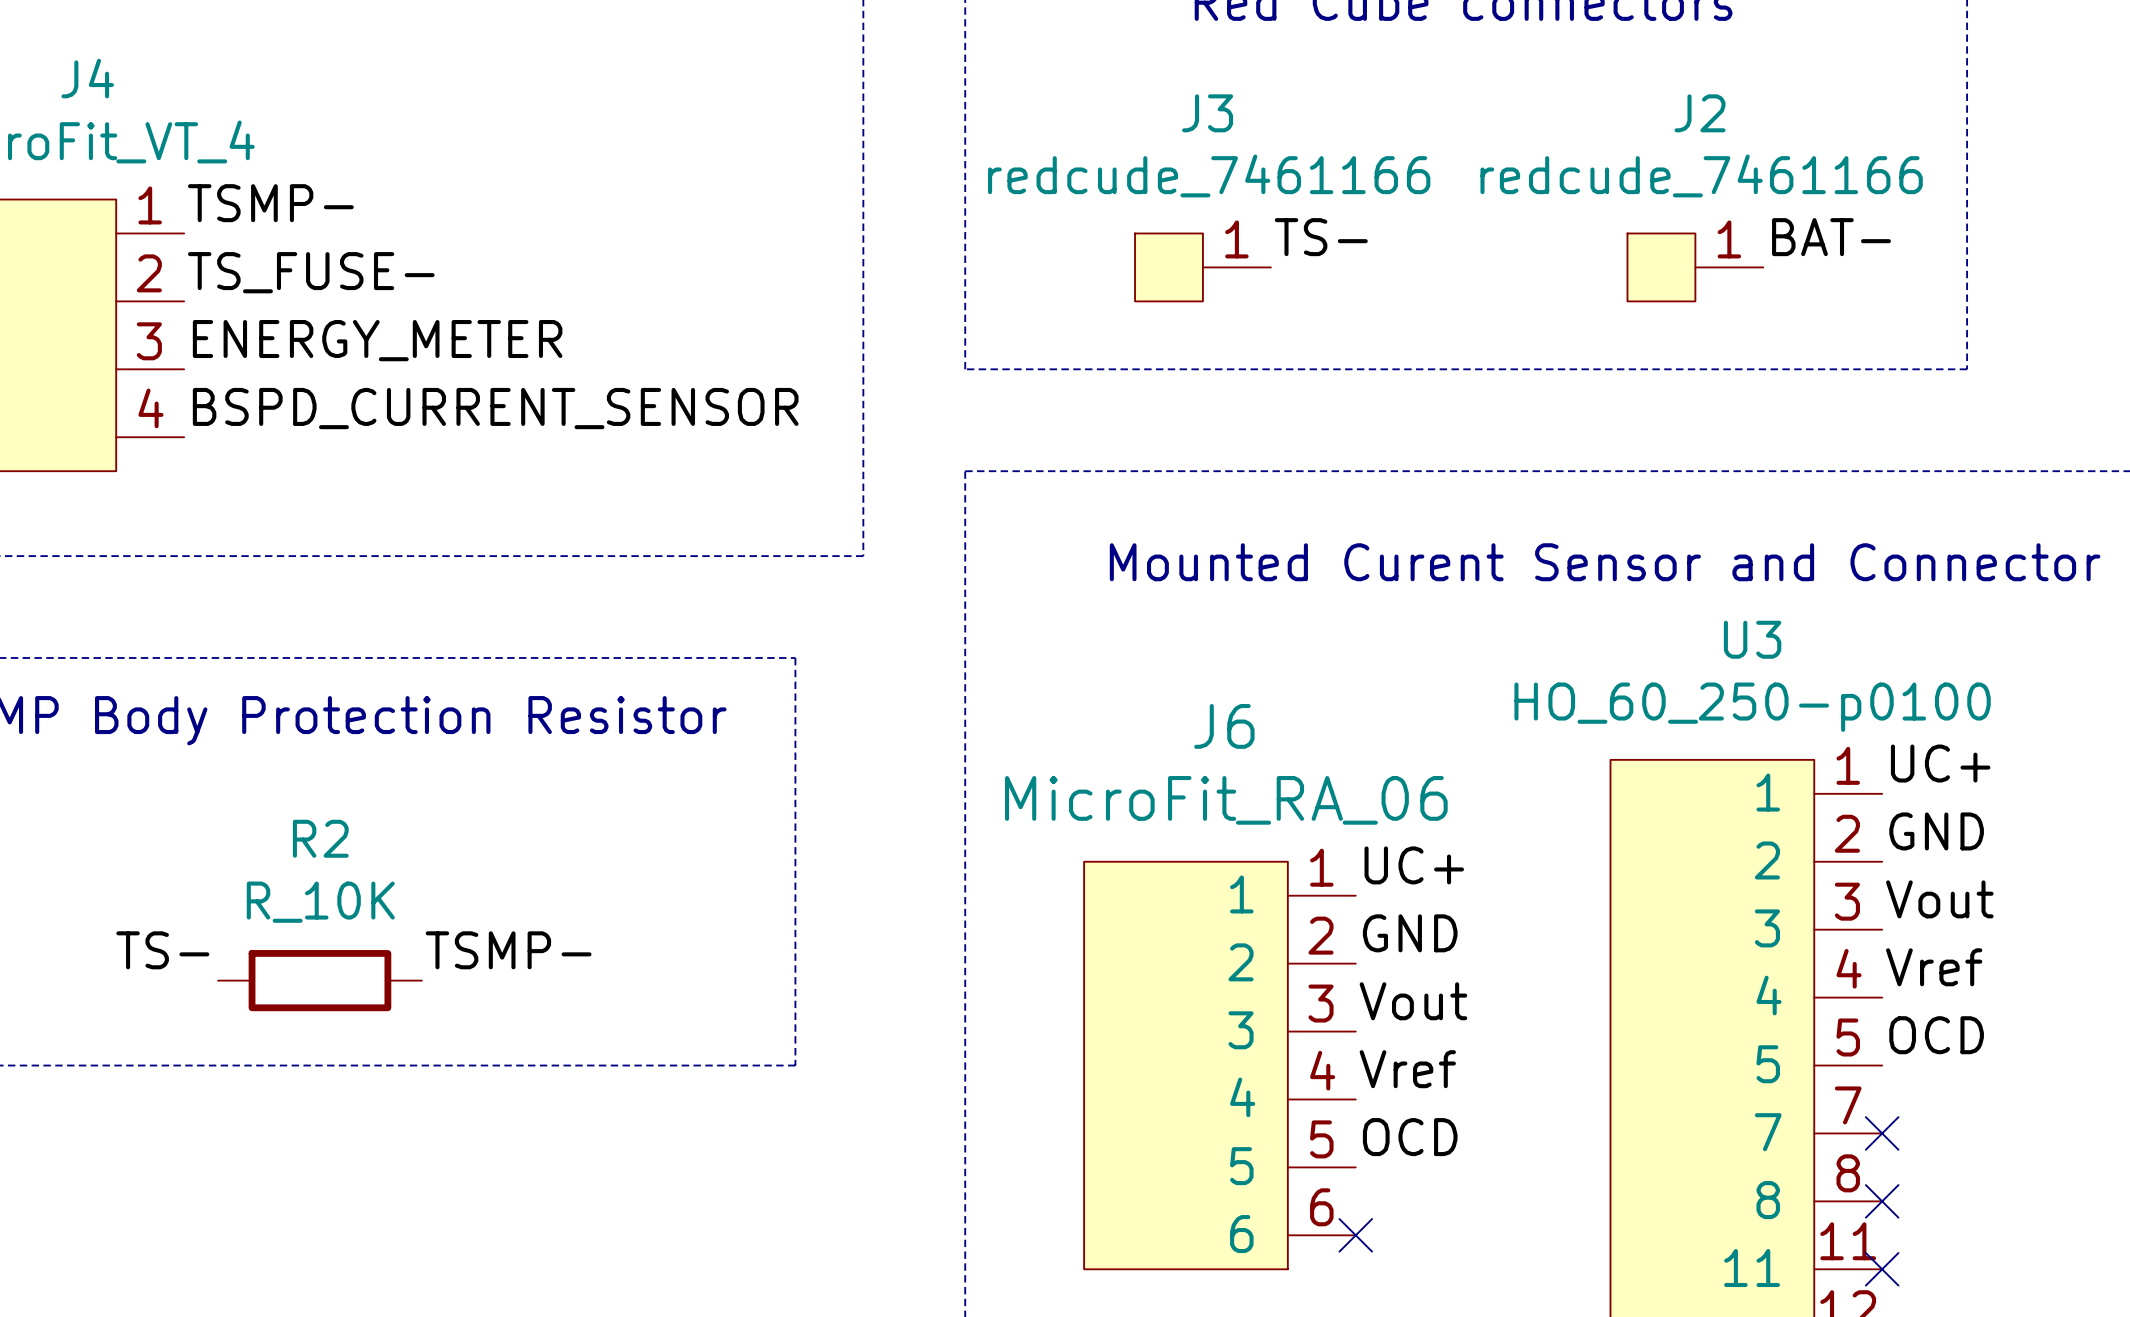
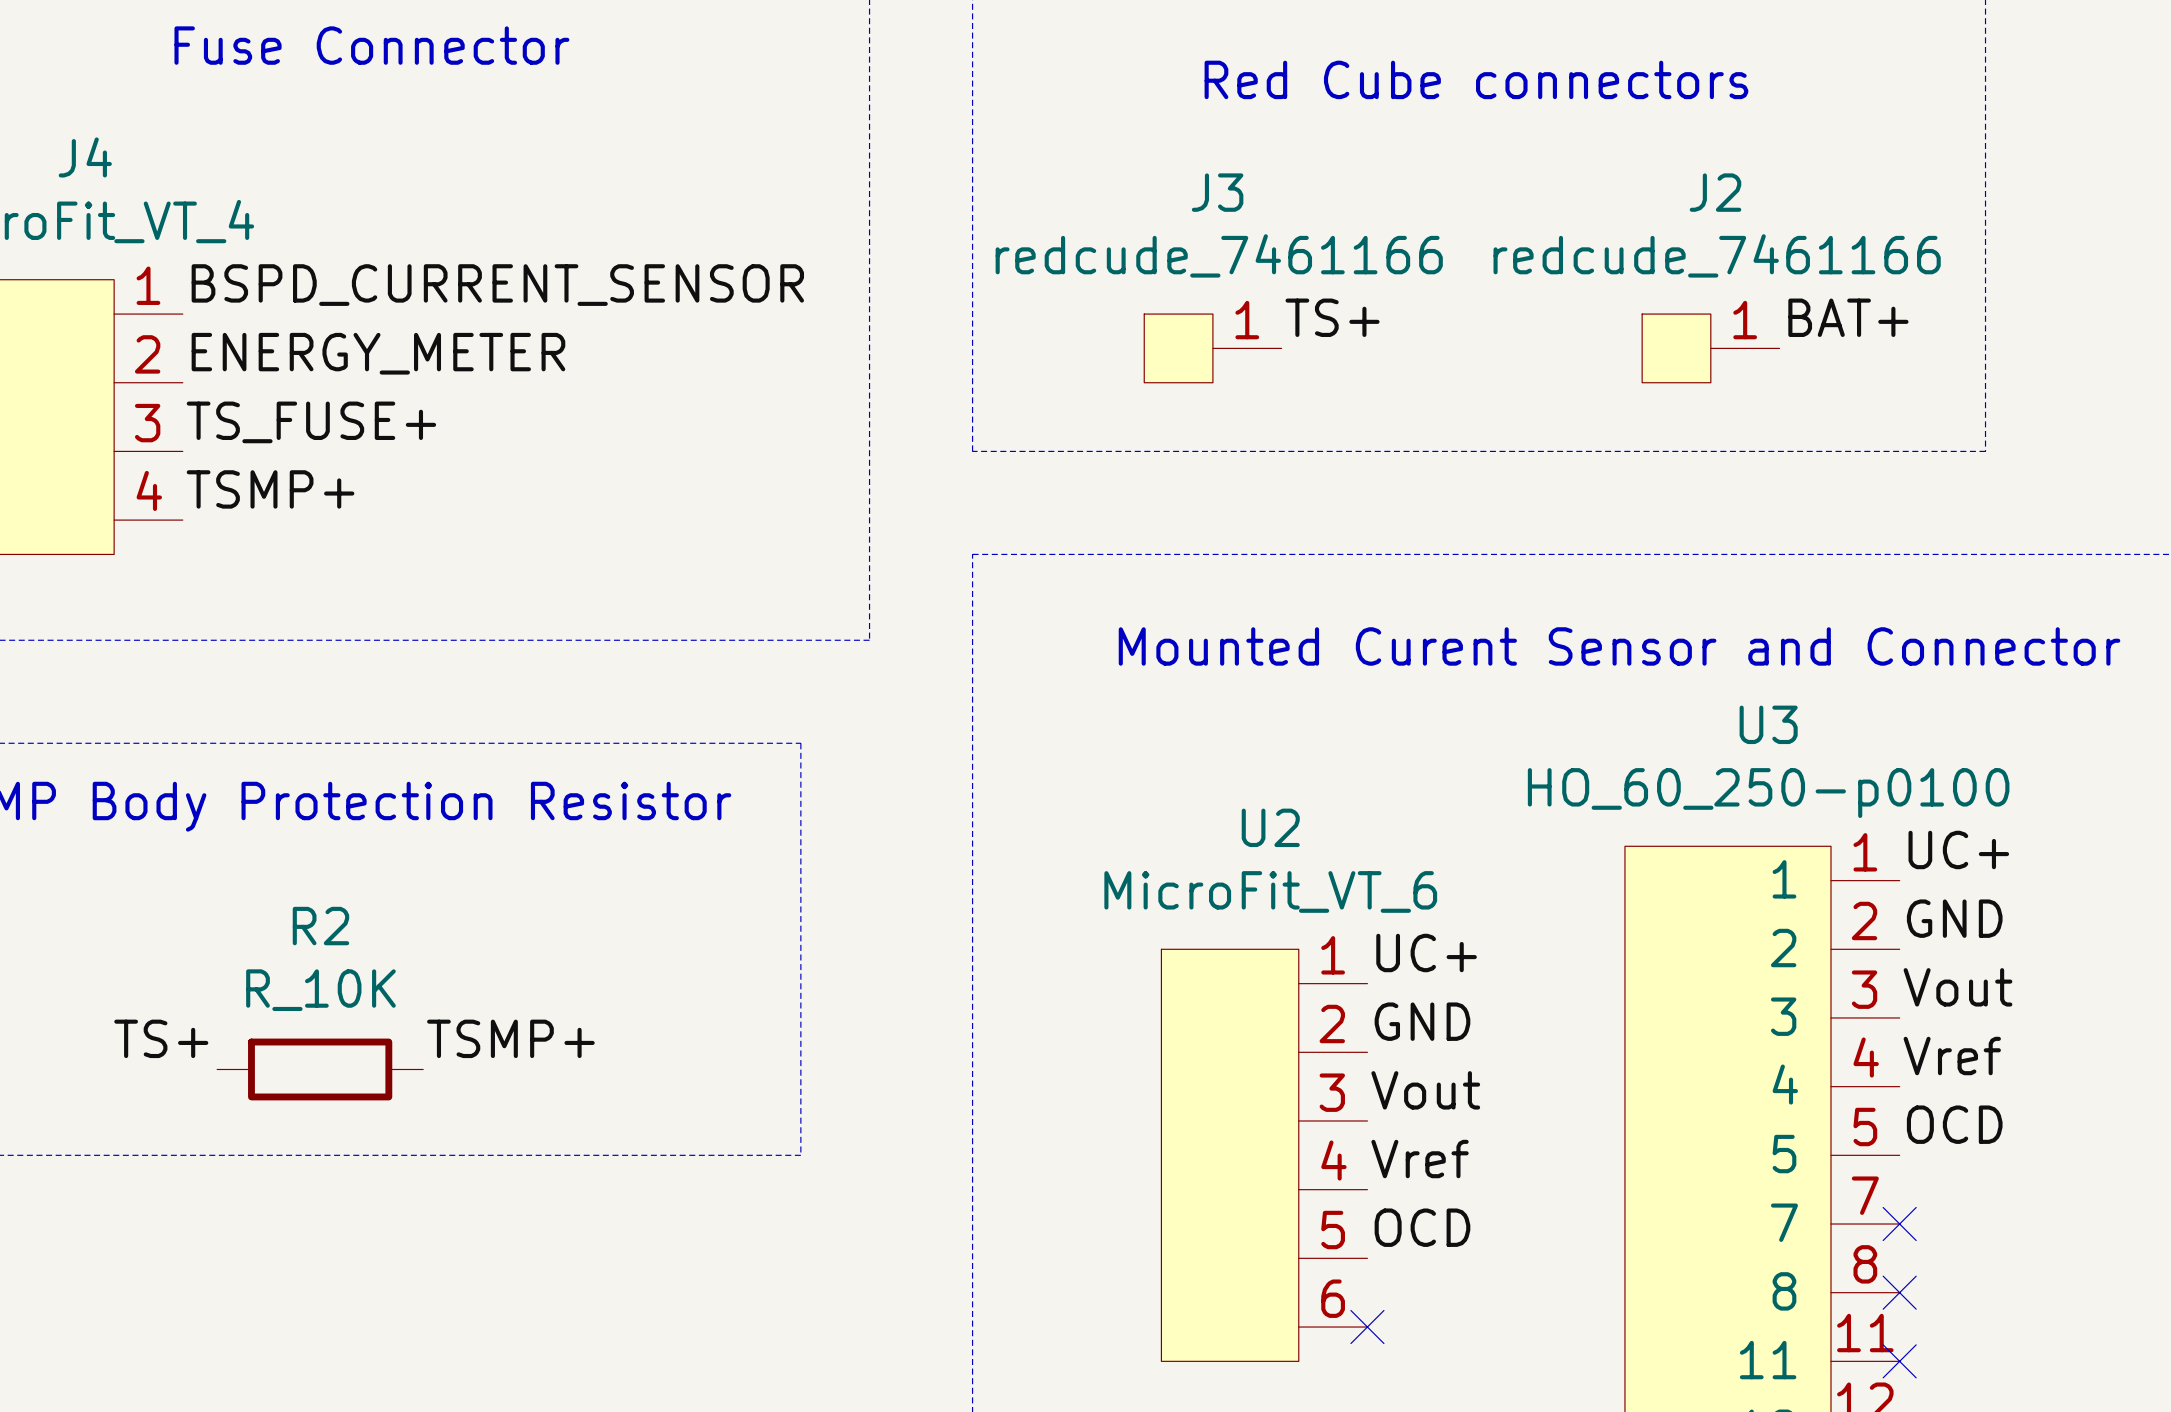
label: TSMP- (270, 203) -> BSPD_CURRENT_SENSOR (497, 285)
label: TS- (1321, 237) -> TS+ (1332, 317)
label: BAT- (1831, 237) -> BAT+ (1848, 317)
label: TS_FUSE- (311, 272) -> ENERGY_METER (378, 353)
label: ENERGY_METER (377, 340) -> TS_FUSE+ (311, 422)
label: BSPD_CURRENT_SENSOR (495, 408) -> TSMP+ (270, 489)
label: TS- (162, 950) -> TS+ (161, 1038)
label: TSMP- (508, 950) -> TSMP+ (510, 1038)
J6: MicroFit_RA_06 (1219, 1065) -> none
U2: none -> MicroFit_VT_6 (1264, 1155)

